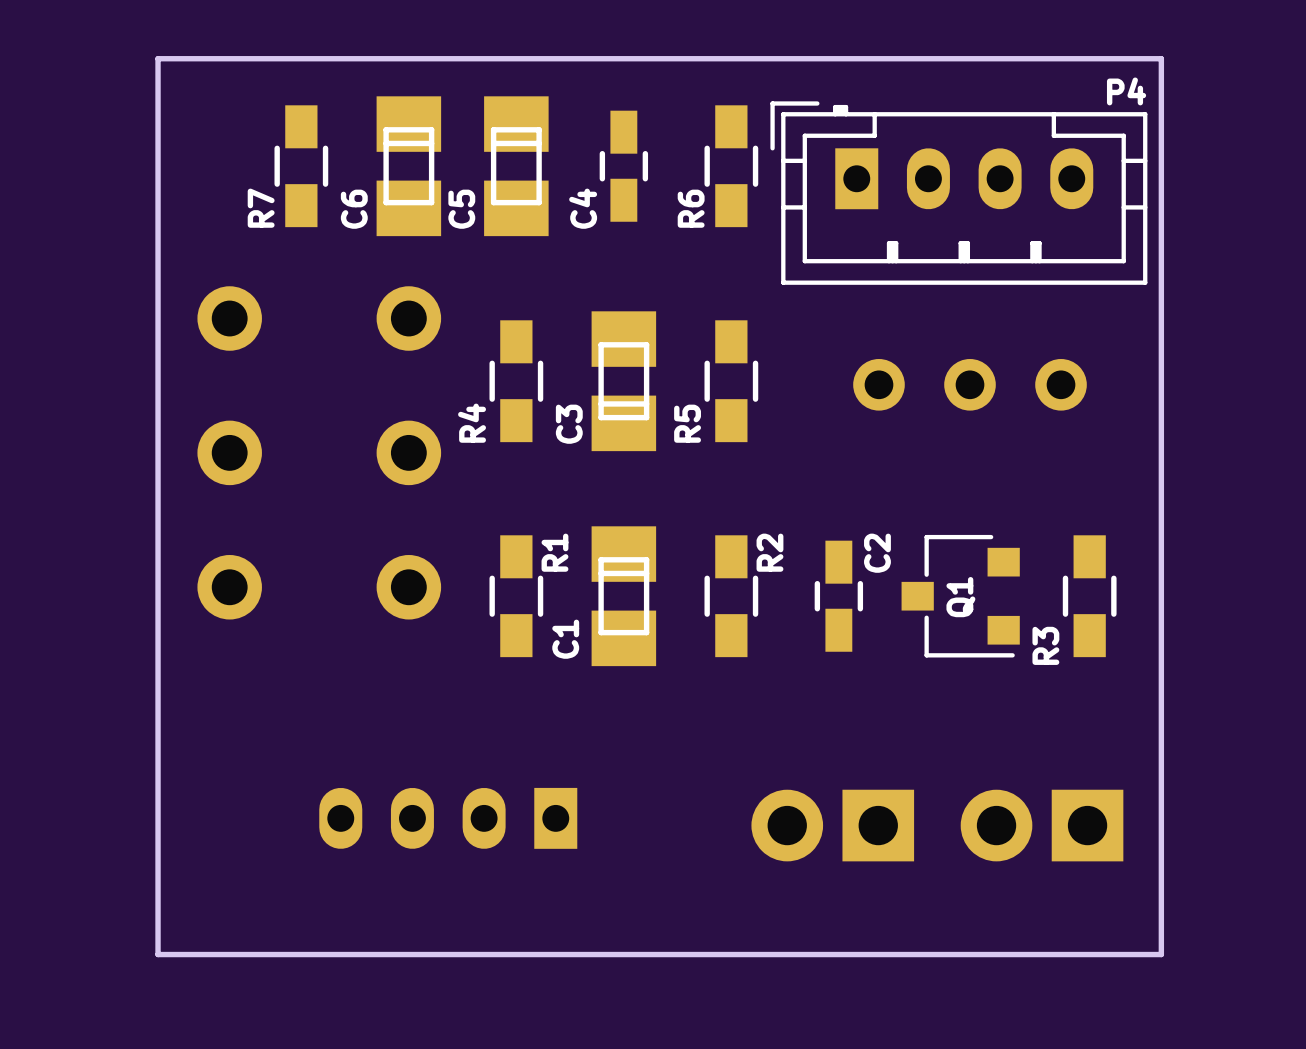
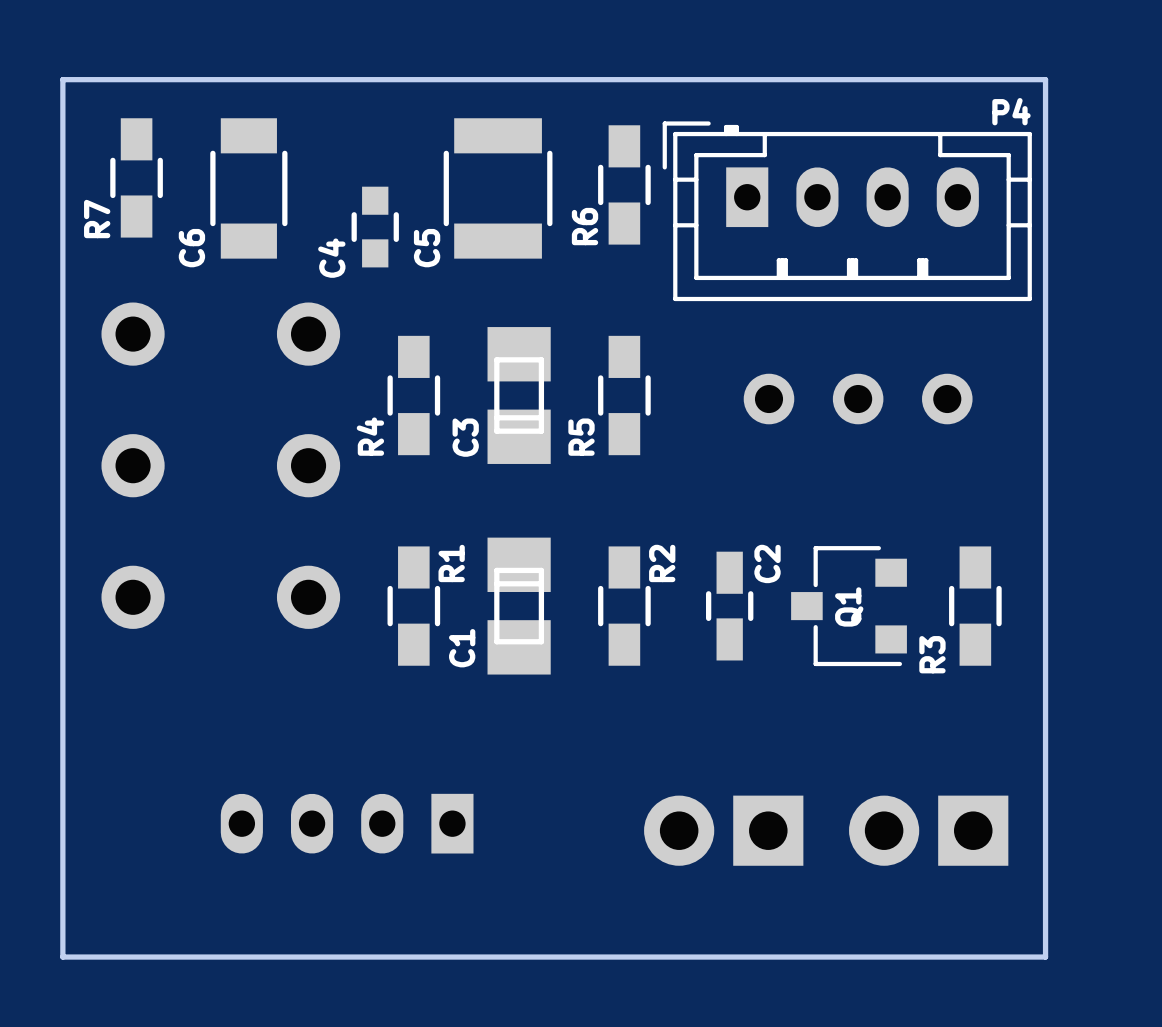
C6 footprint: [376, 96, 442, 237] -> [210, 118, 288, 259]
C5 footprint: [484, 96, 549, 237] -> [443, 118, 553, 259]
C4 footprint: [599, 110, 649, 222] -> [351, 186, 399, 268]
R7 position: (301, 166) -> (136, 177)

